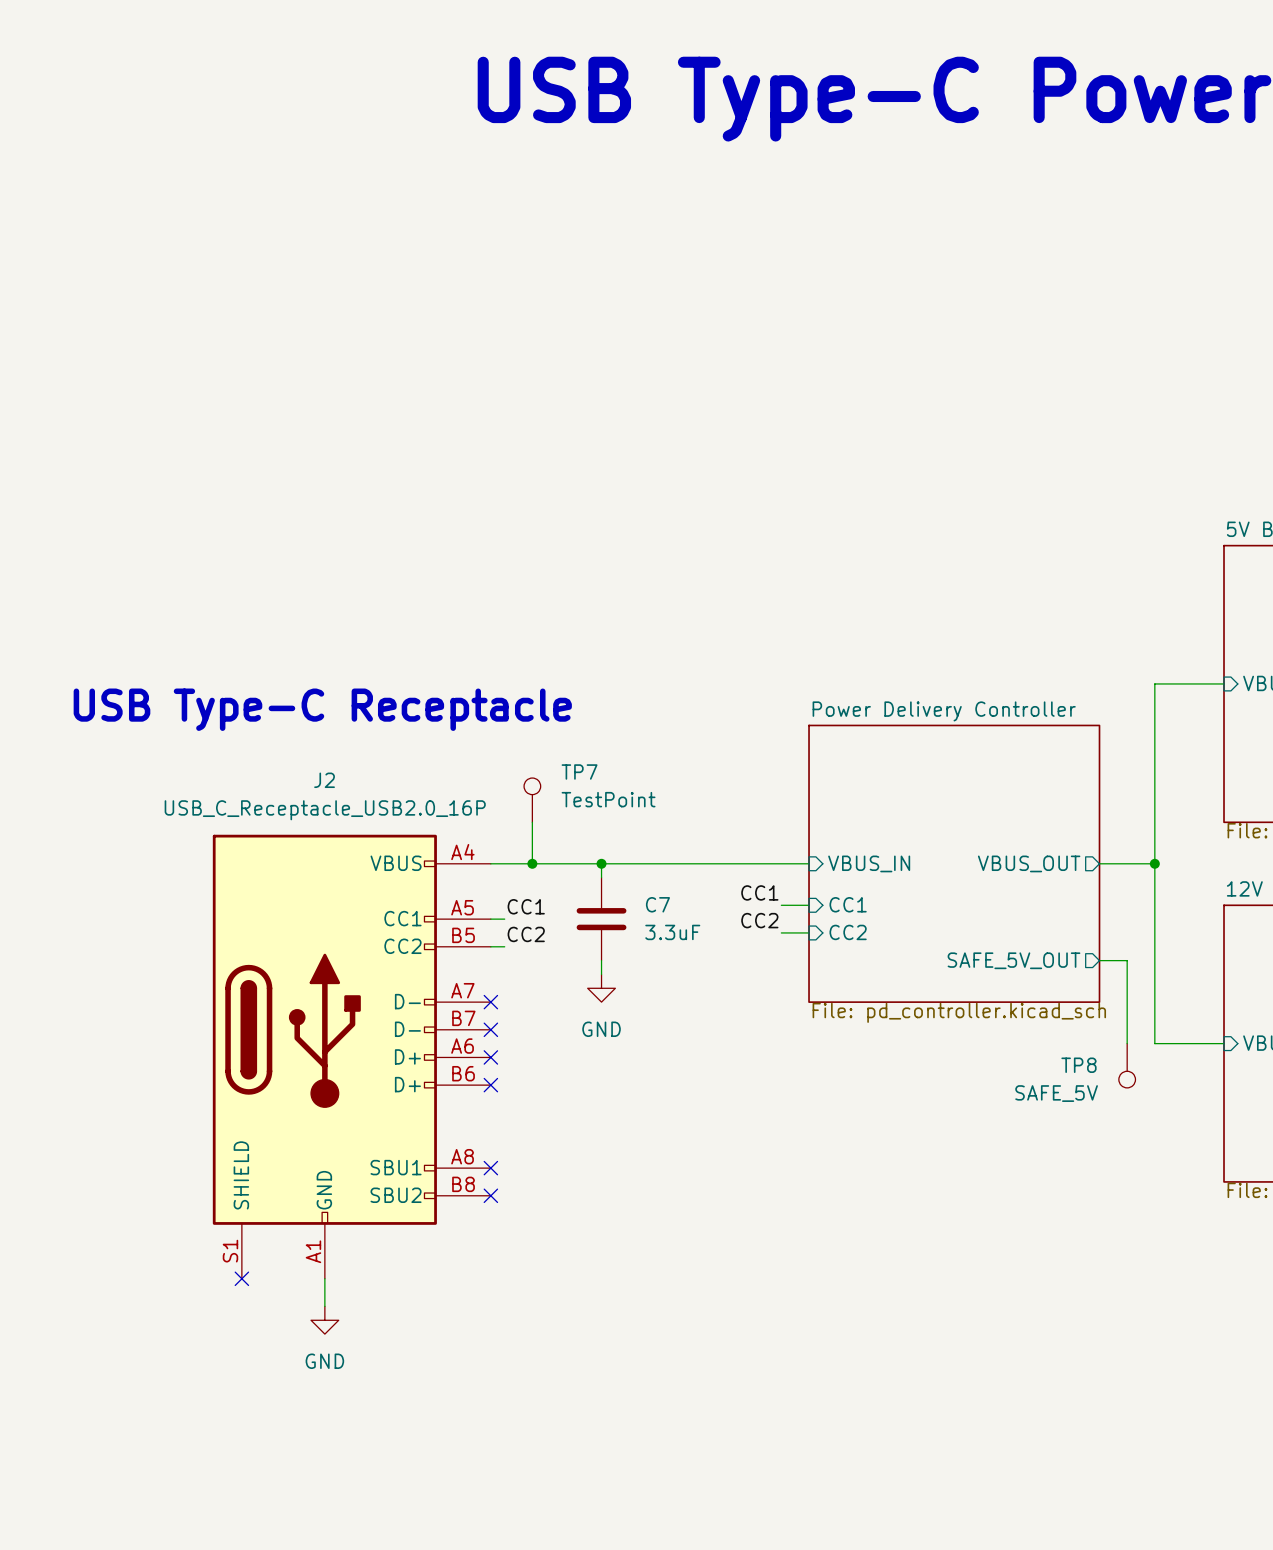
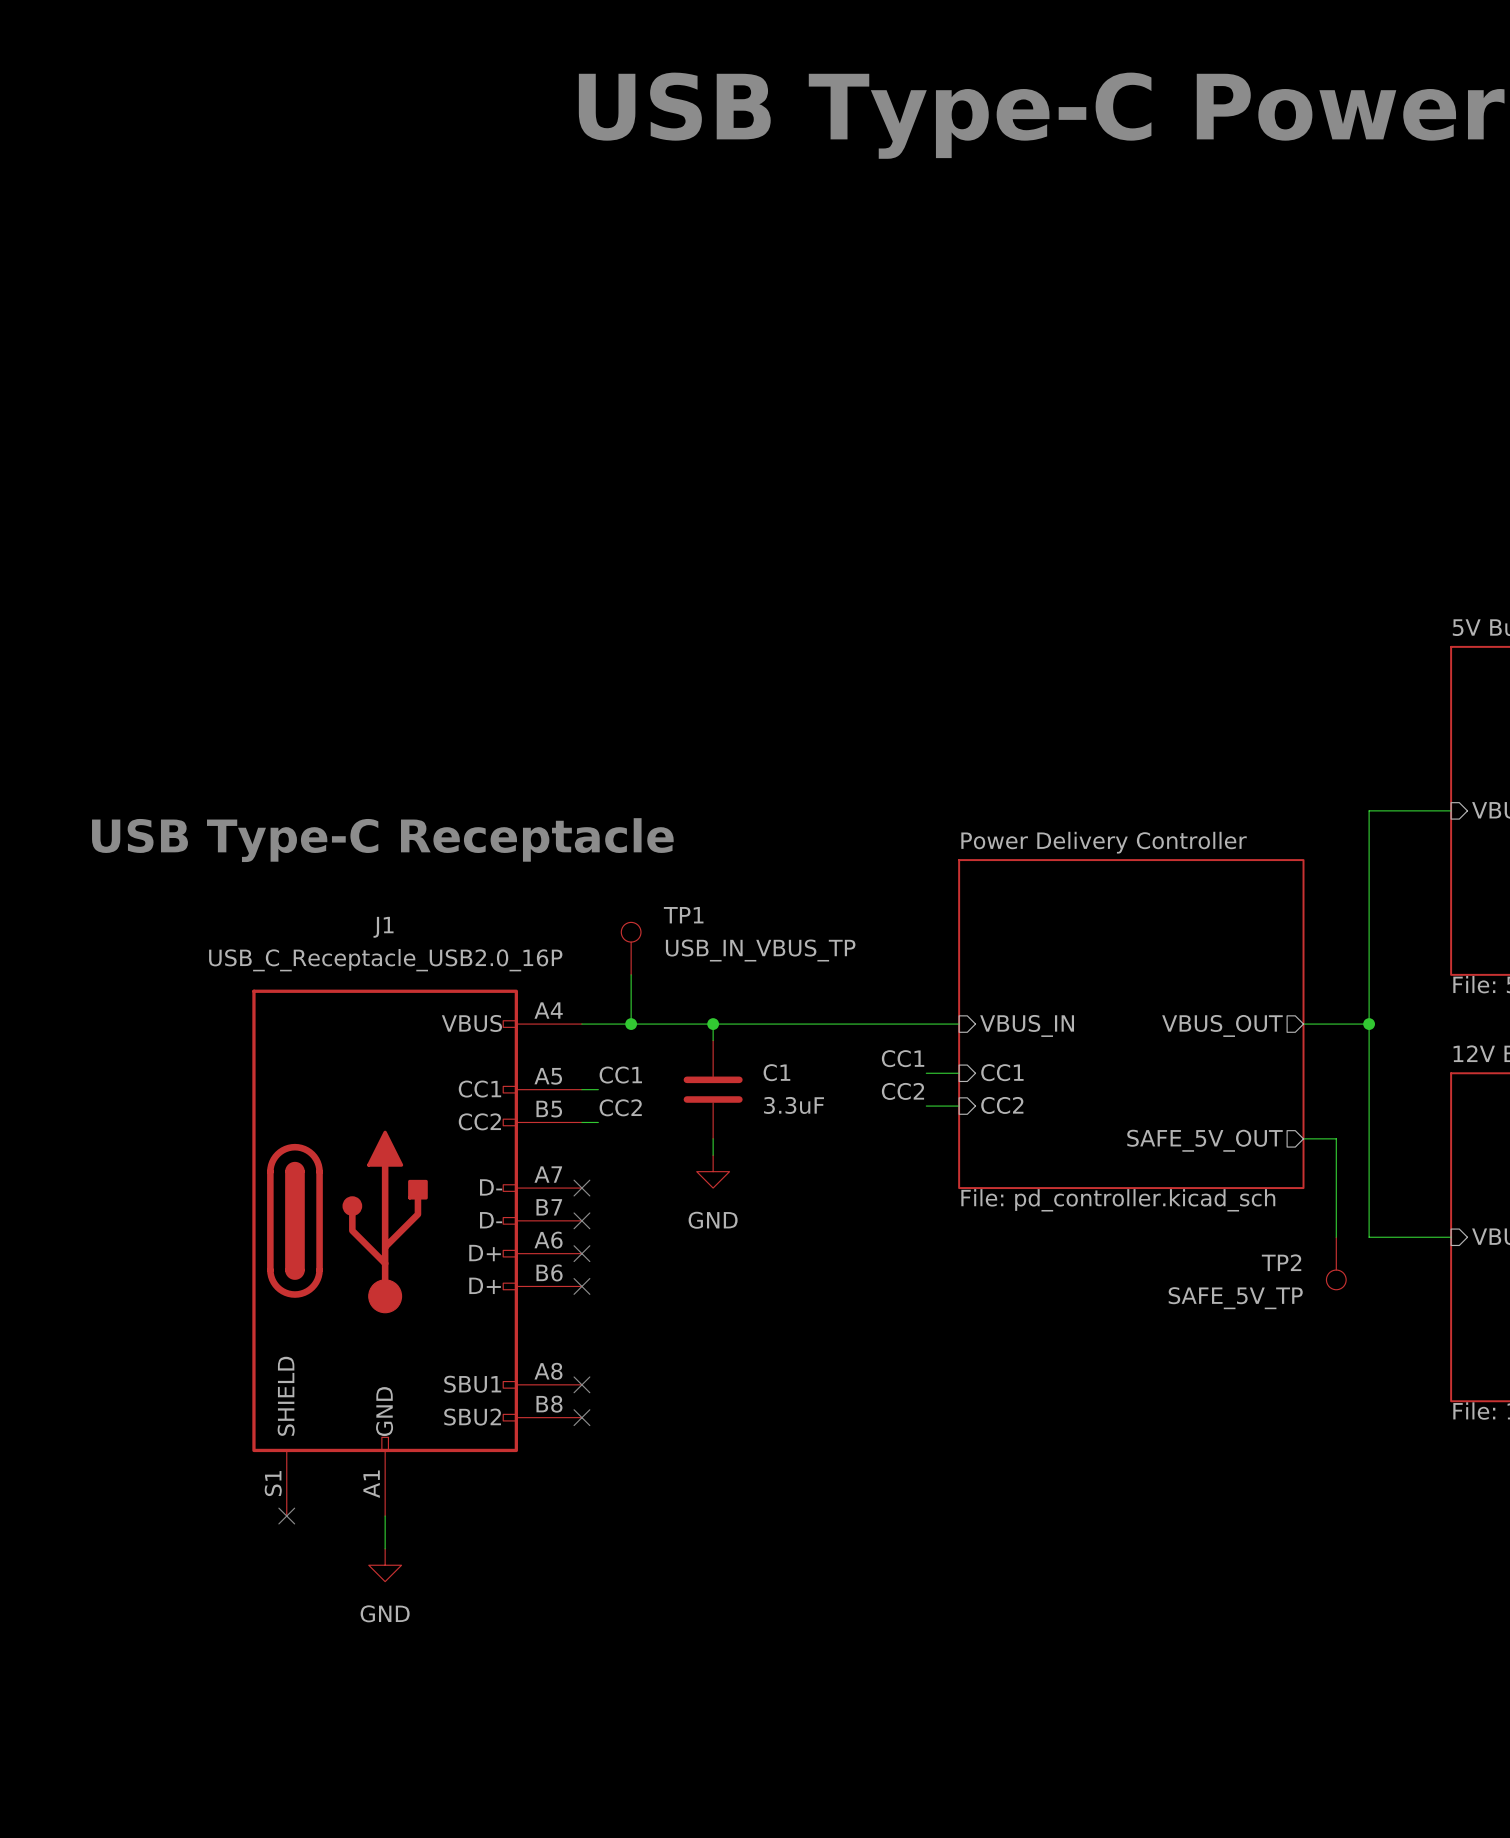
TP7 name: TP7 (579, 771) -> TP1 (683, 915)
J2 name: J2 (324, 780) -> J1 (383, 927)
TP7 value: TestPoint (608, 799) -> USB_IN_VBUS_TP (760, 950)
C7 name: C7 (657, 904) -> C1 (776, 1072)
TP8 name: TP8 (1078, 1065) -> TP2 (1281, 1262)
TP8 value: SAFE_5V (1056, 1093) -> SAFE_5V_TP (1235, 1298)

